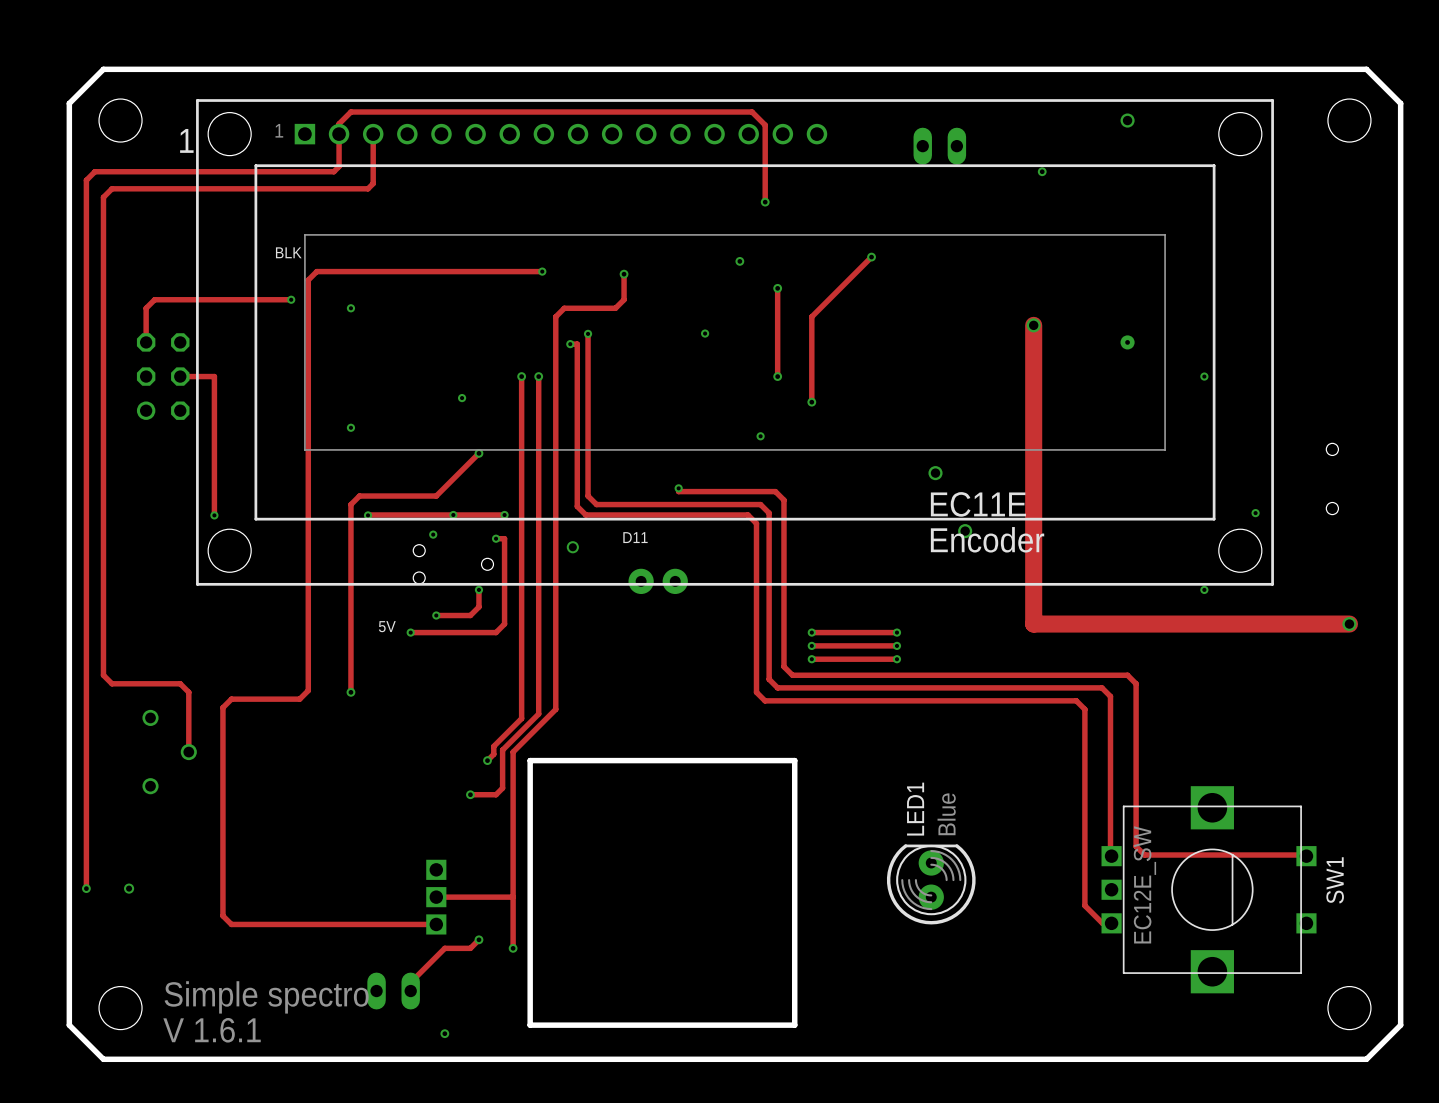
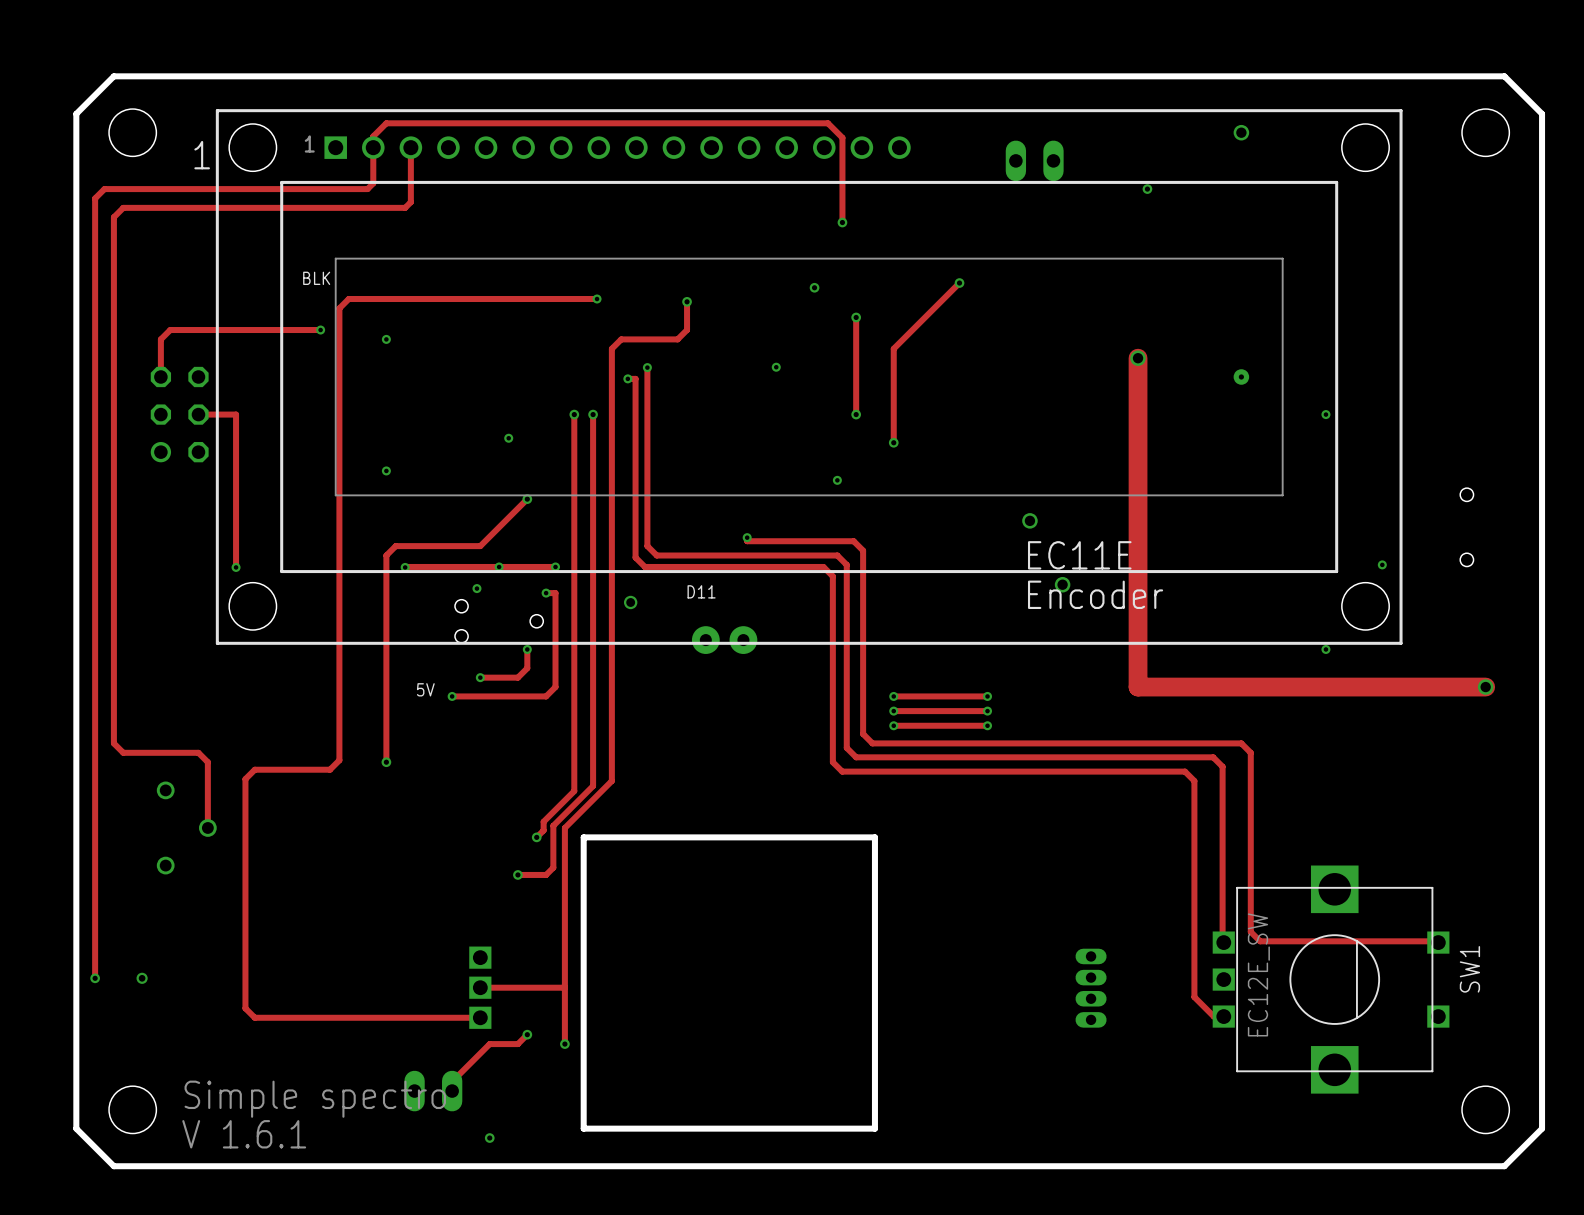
LED1: Blue (931, 884) -> none
part: none -> (1091, 988)

